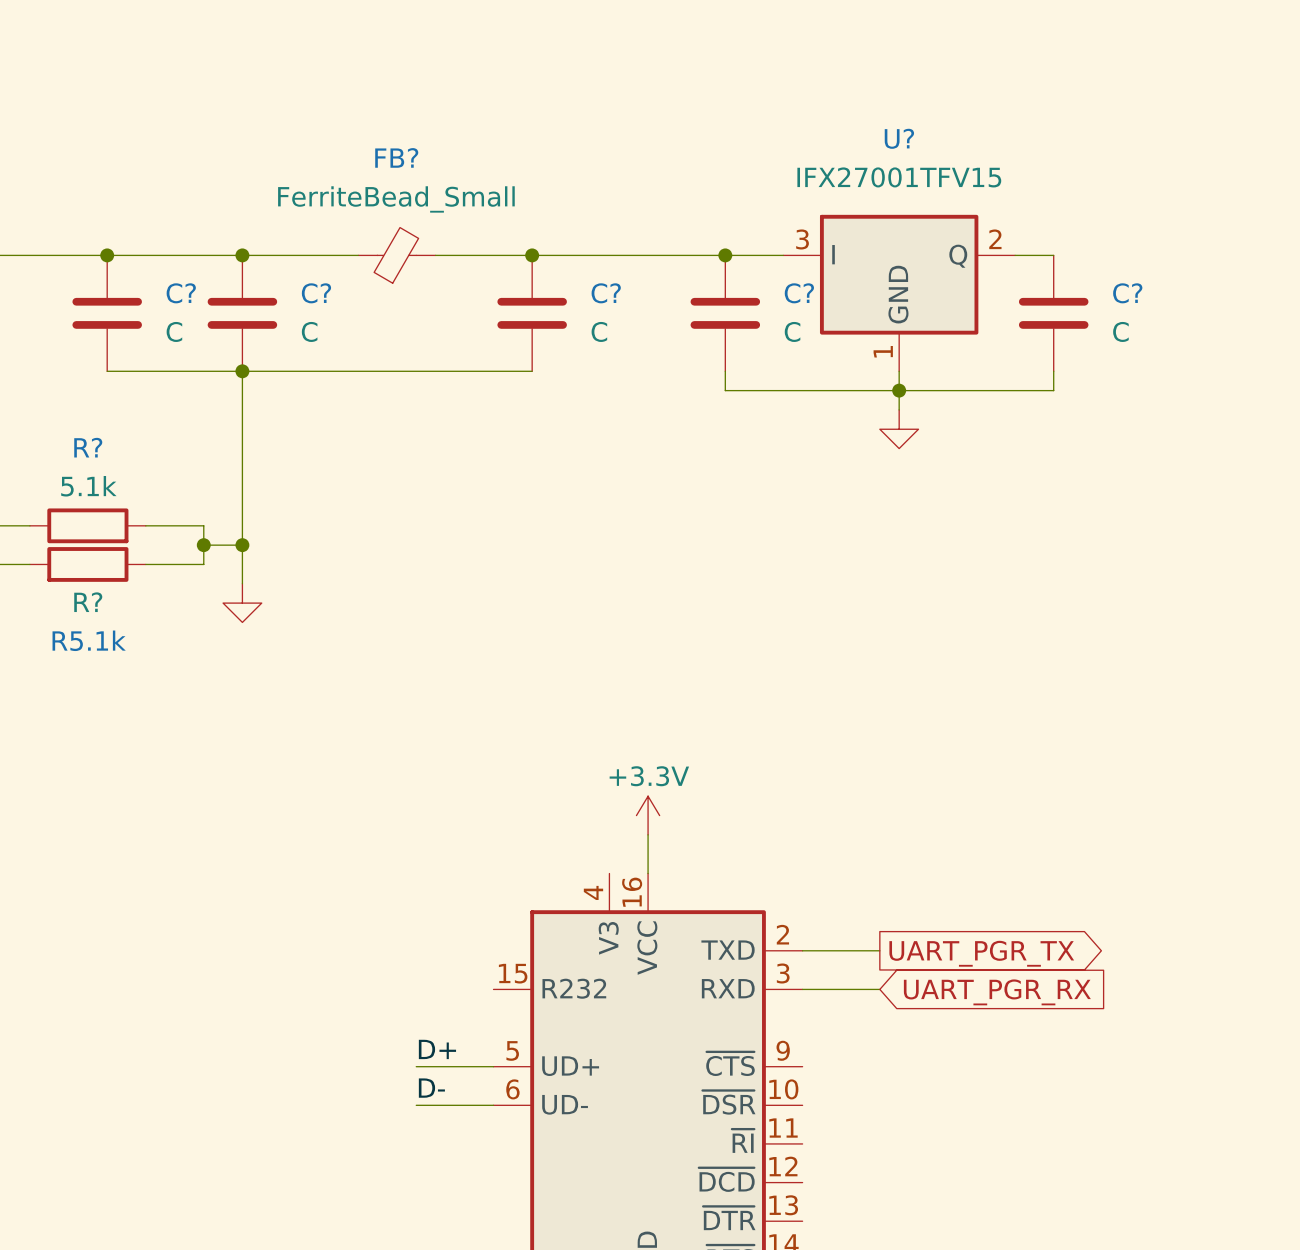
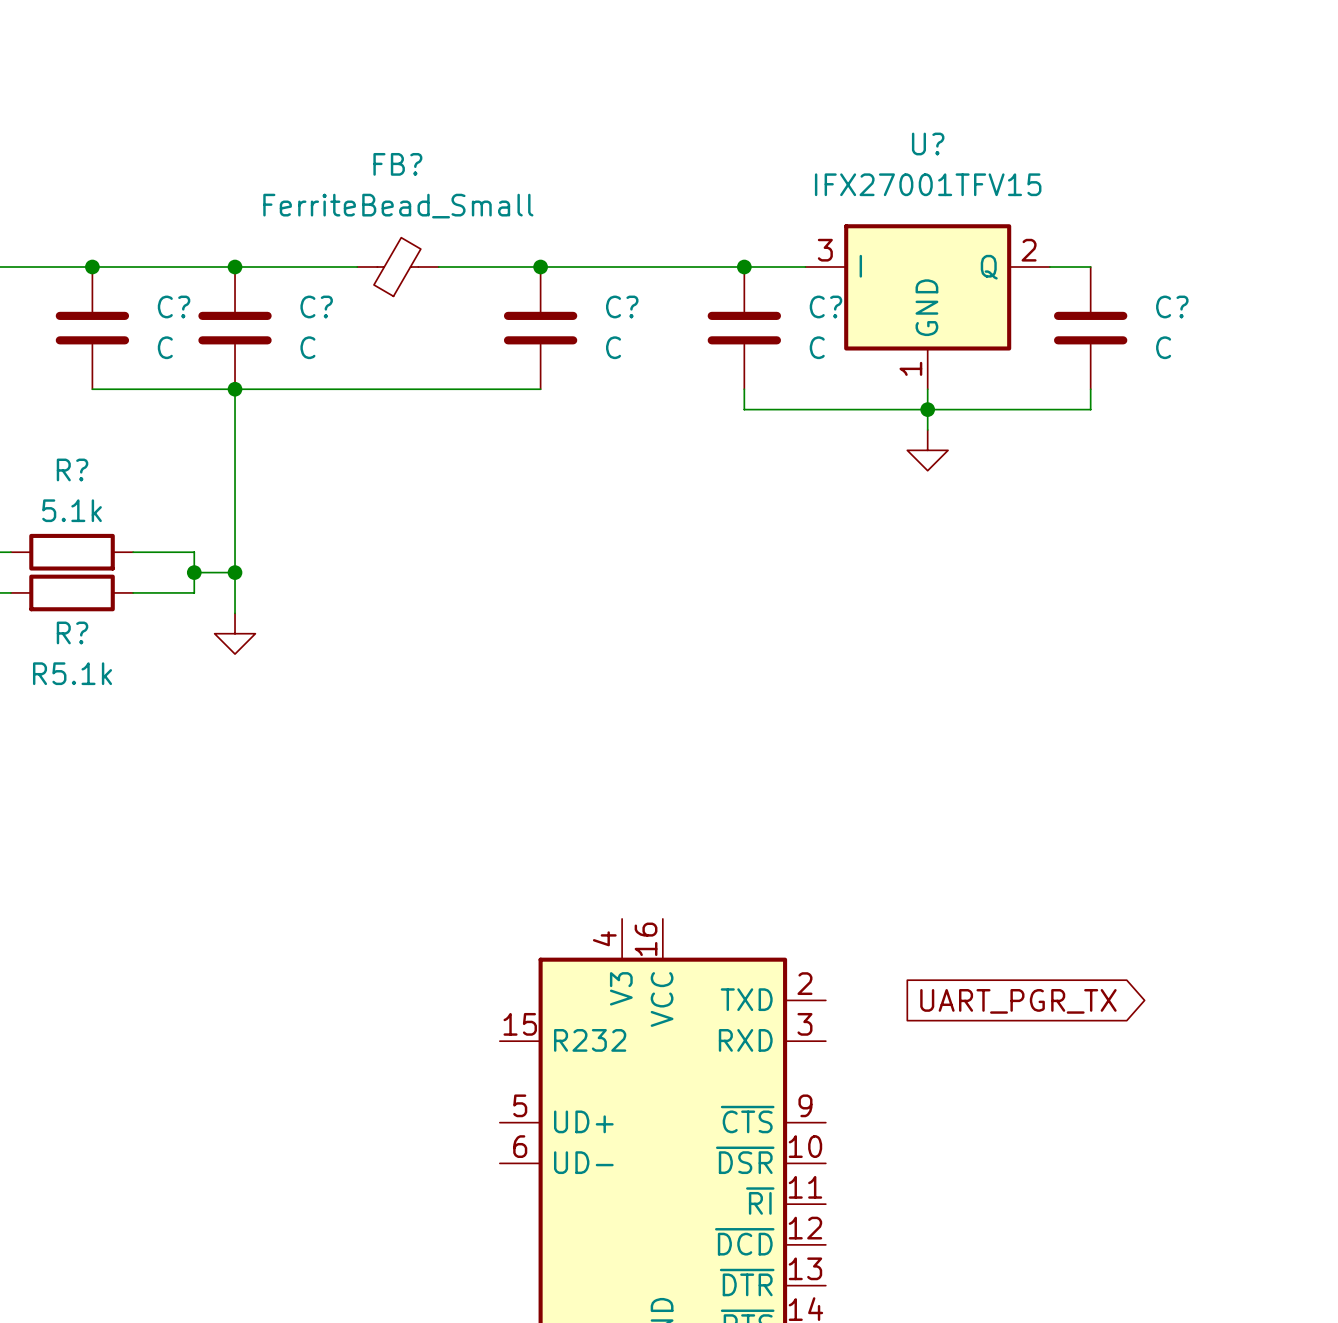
power symbol: +3.3V (648, 815) -> none
wire: (648, 834) (648, 873) -> none
wire: (802, 950) (879, 950) -> none
wire: (802, 989) (879, 989) -> none
global label: UART_PGR_RX (997, 992) -> none
label: D+ (437, 1049) -> none
wire: (416, 1066) (493, 1066) -> none
label: D- (431, 1088) -> none
wire: (416, 1105) (493, 1105) -> none

